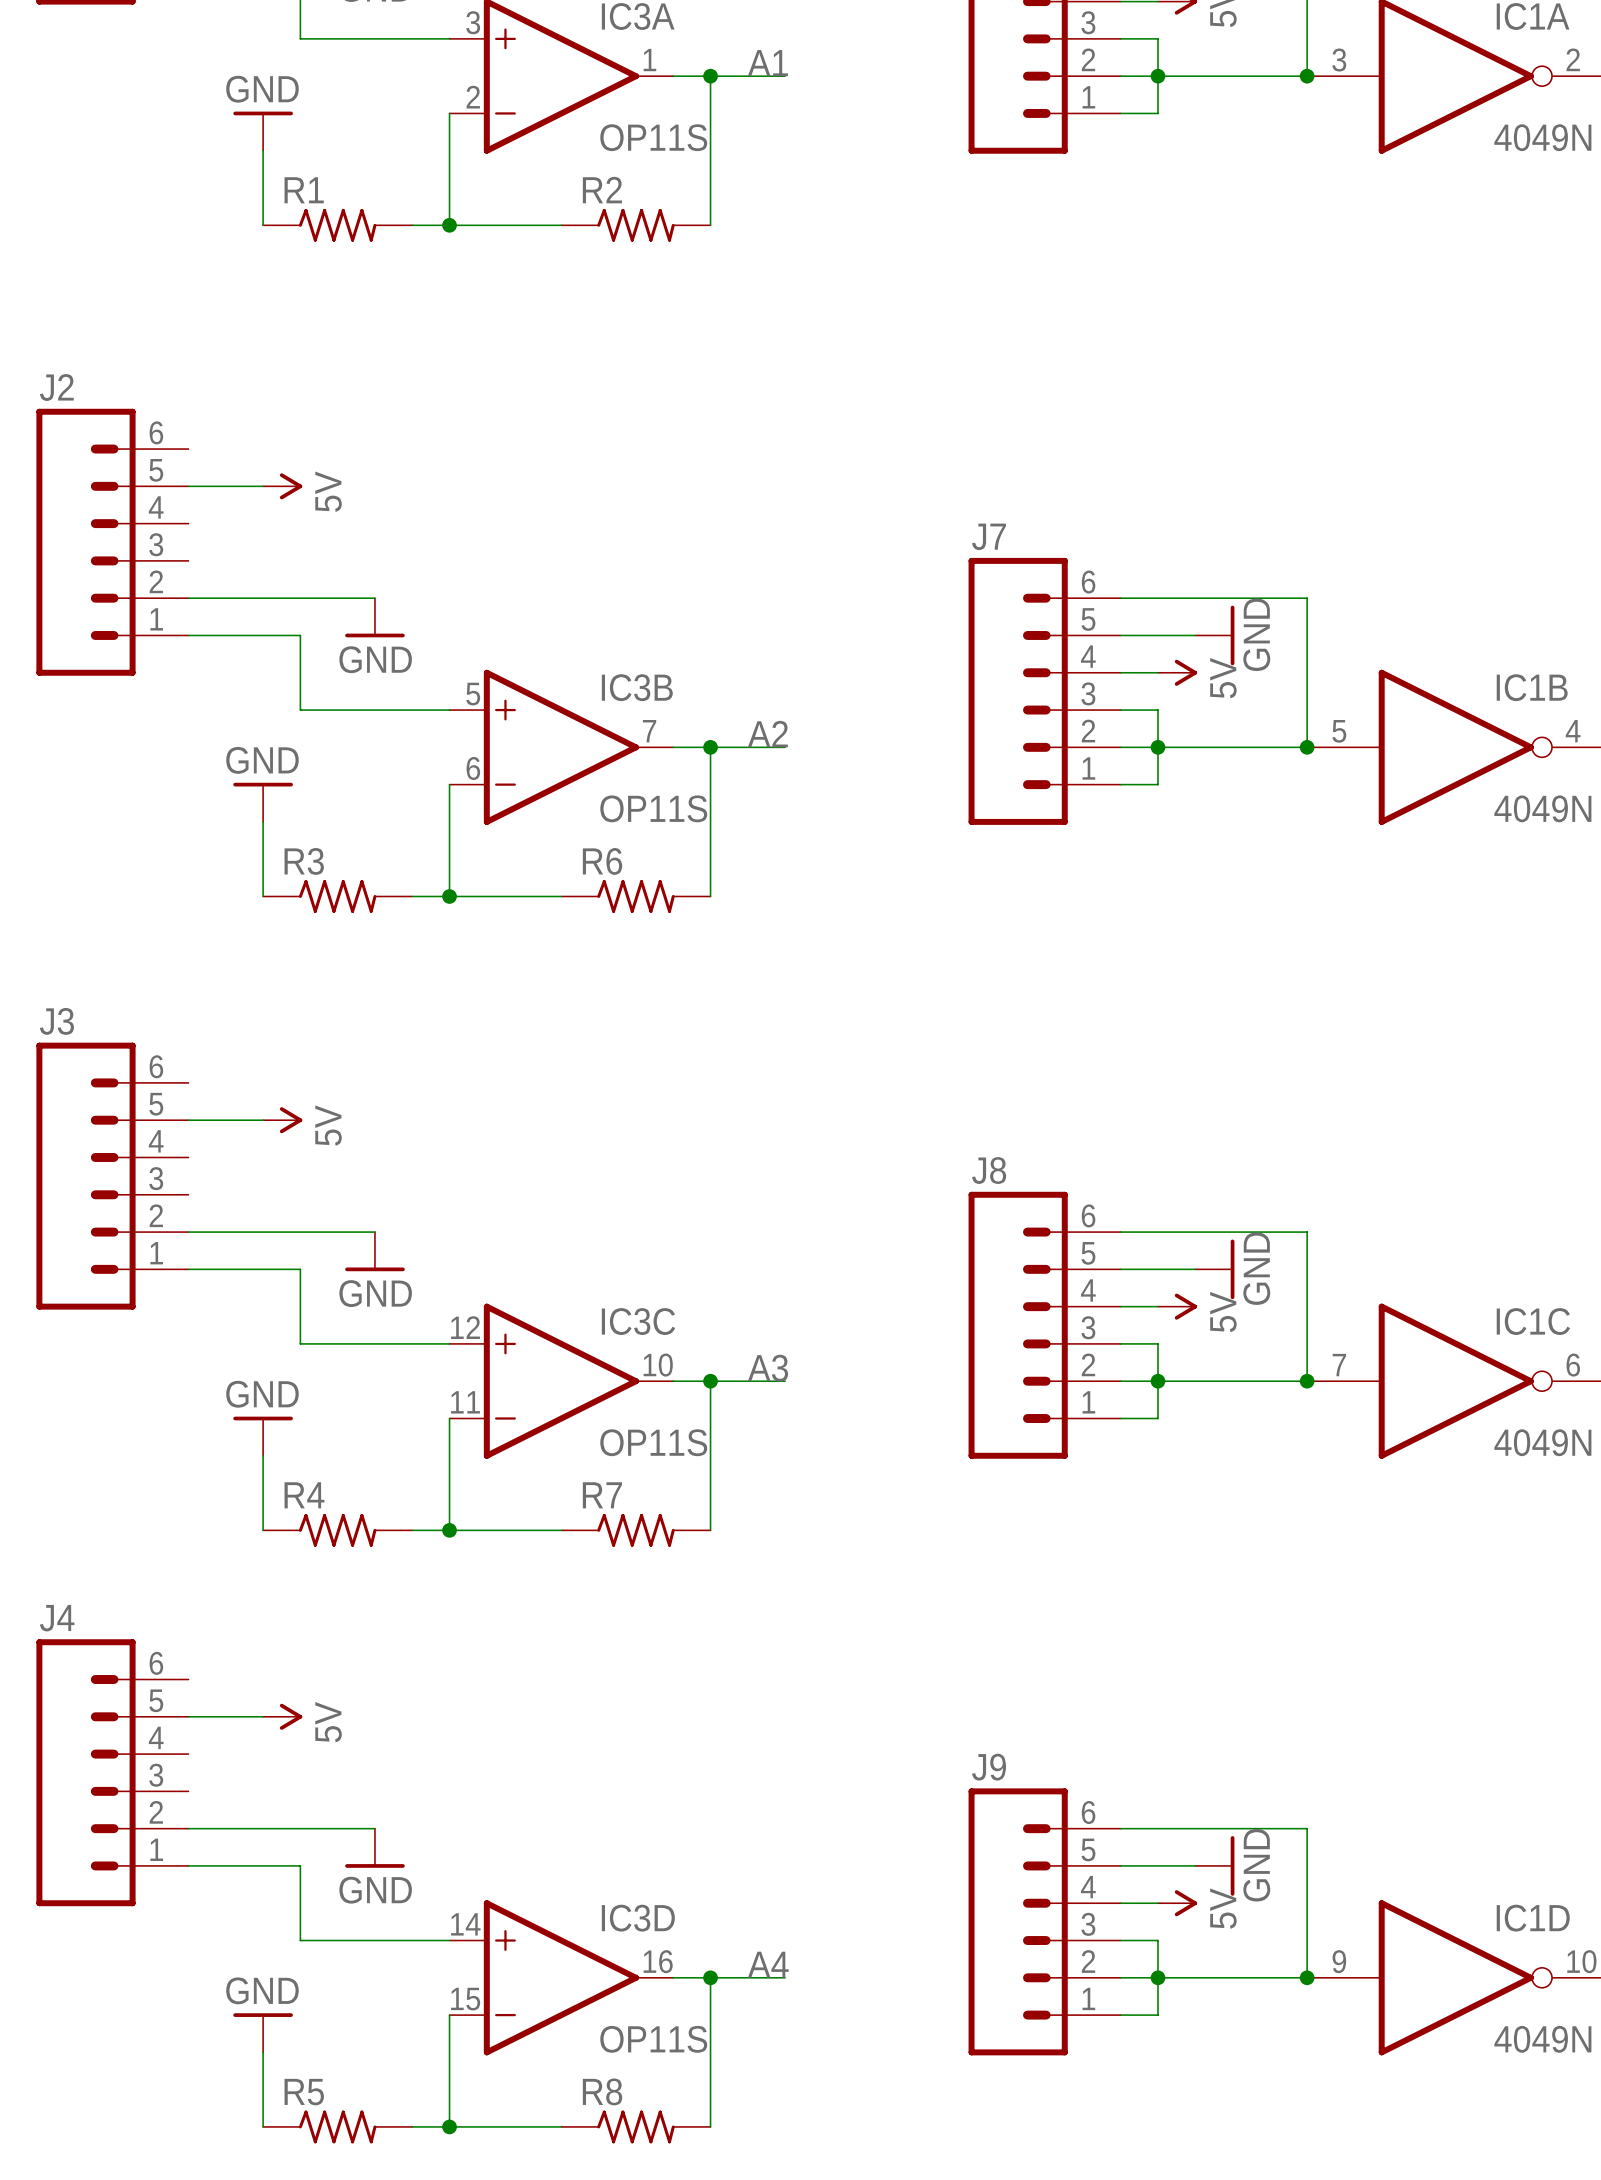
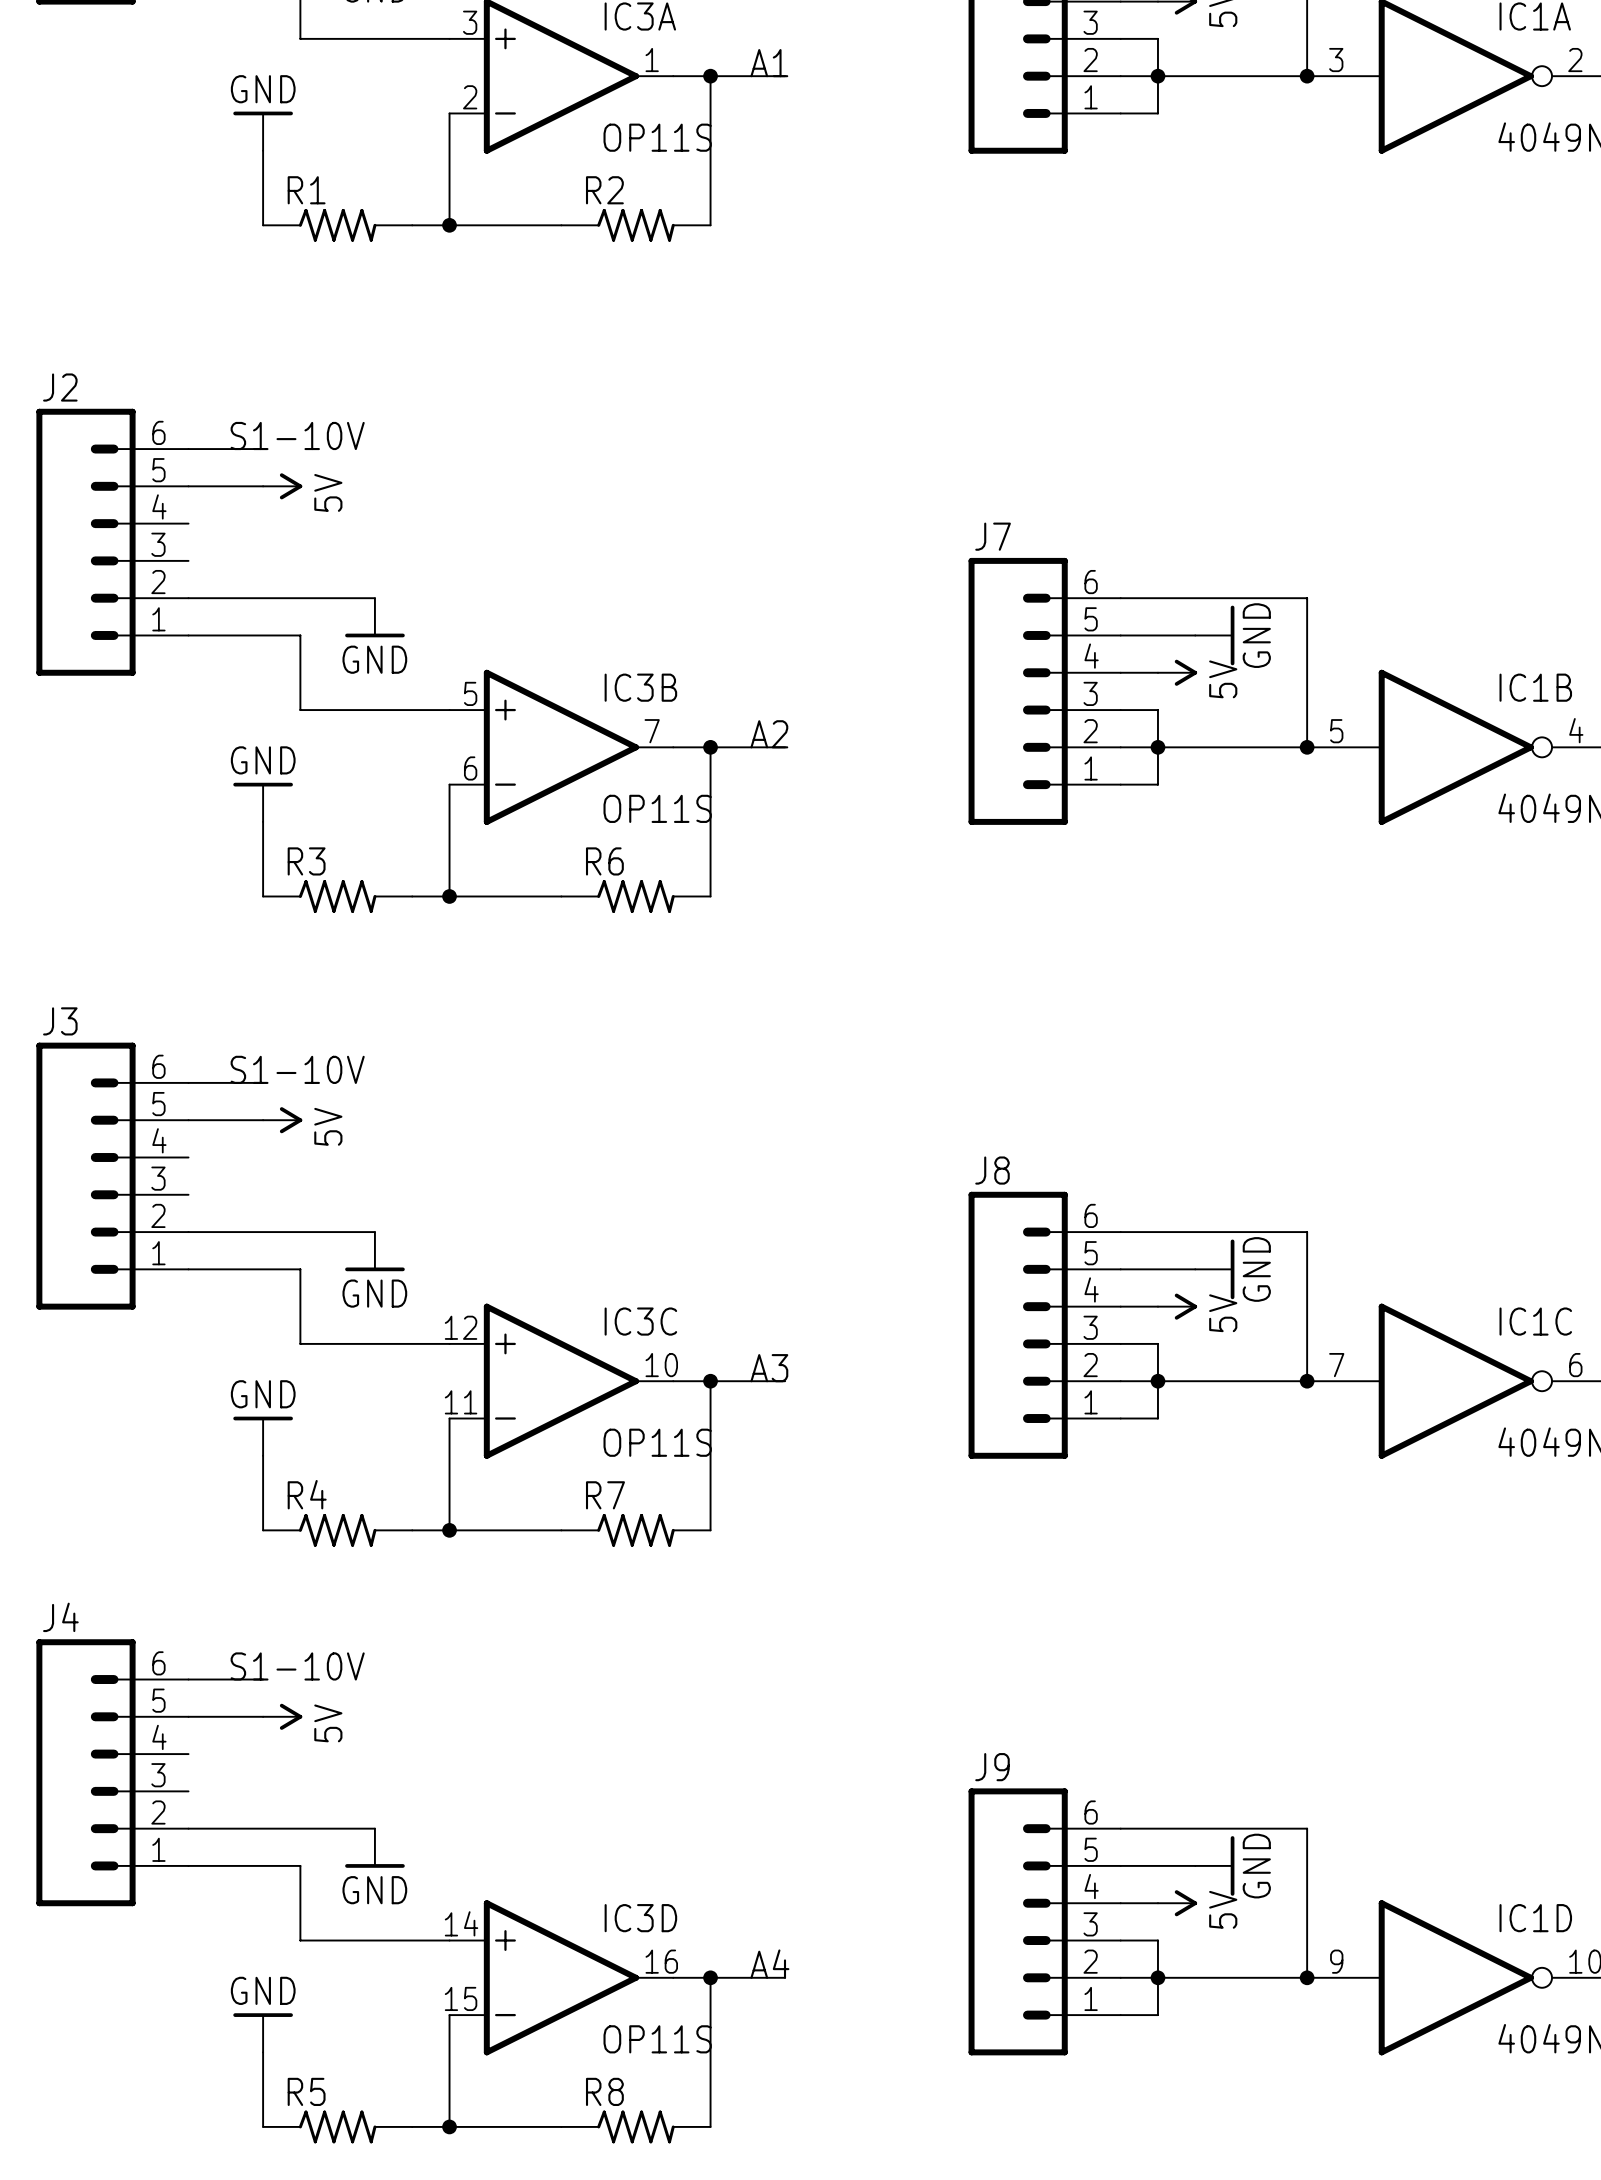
label: none -> S1-10V (297, 435)
wire: none -> (188, 449) (263, 449)
label: none -> S1-10V (297, 1069)
wire: none -> (188, 1082) (263, 1082)
label: none -> S1-10V (297, 1666)
wire: none -> (188, 1679) (263, 1679)

